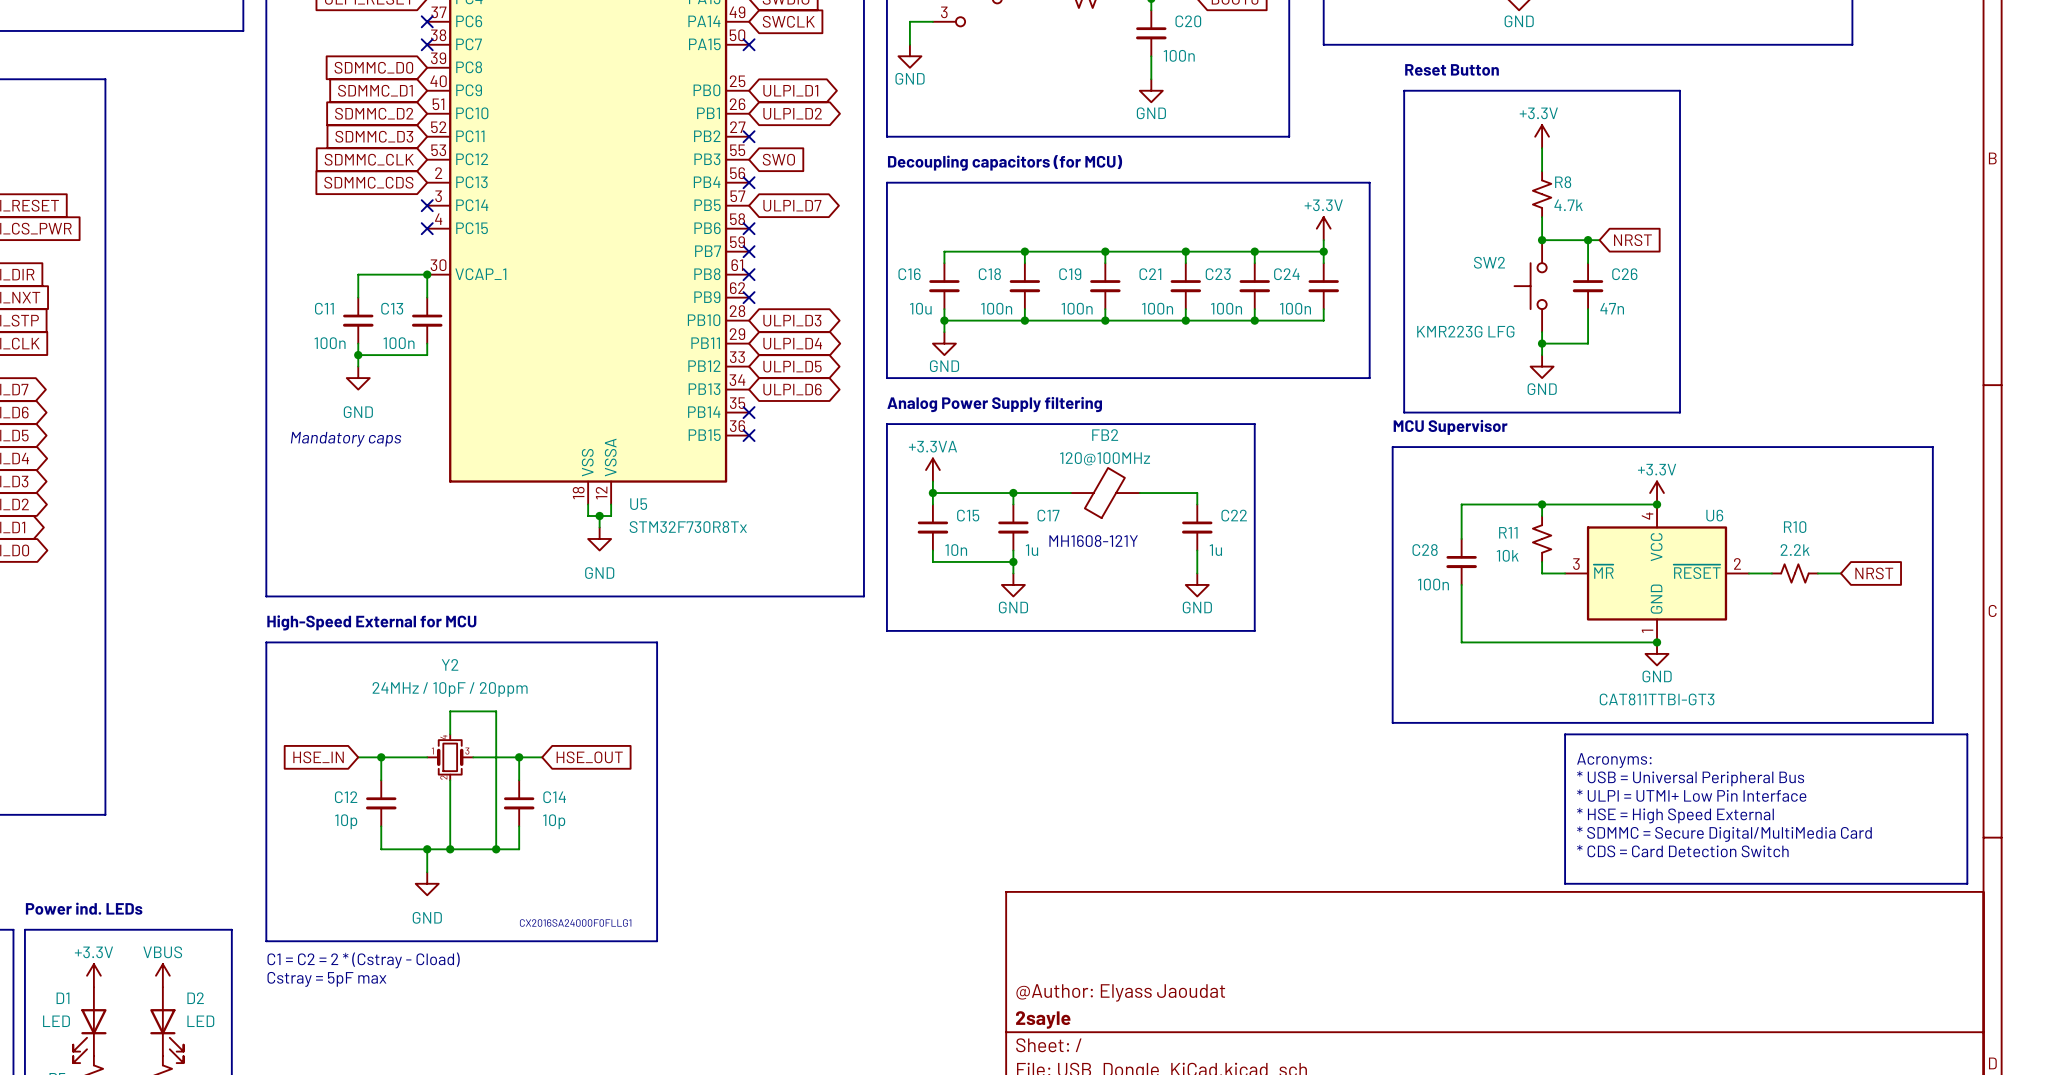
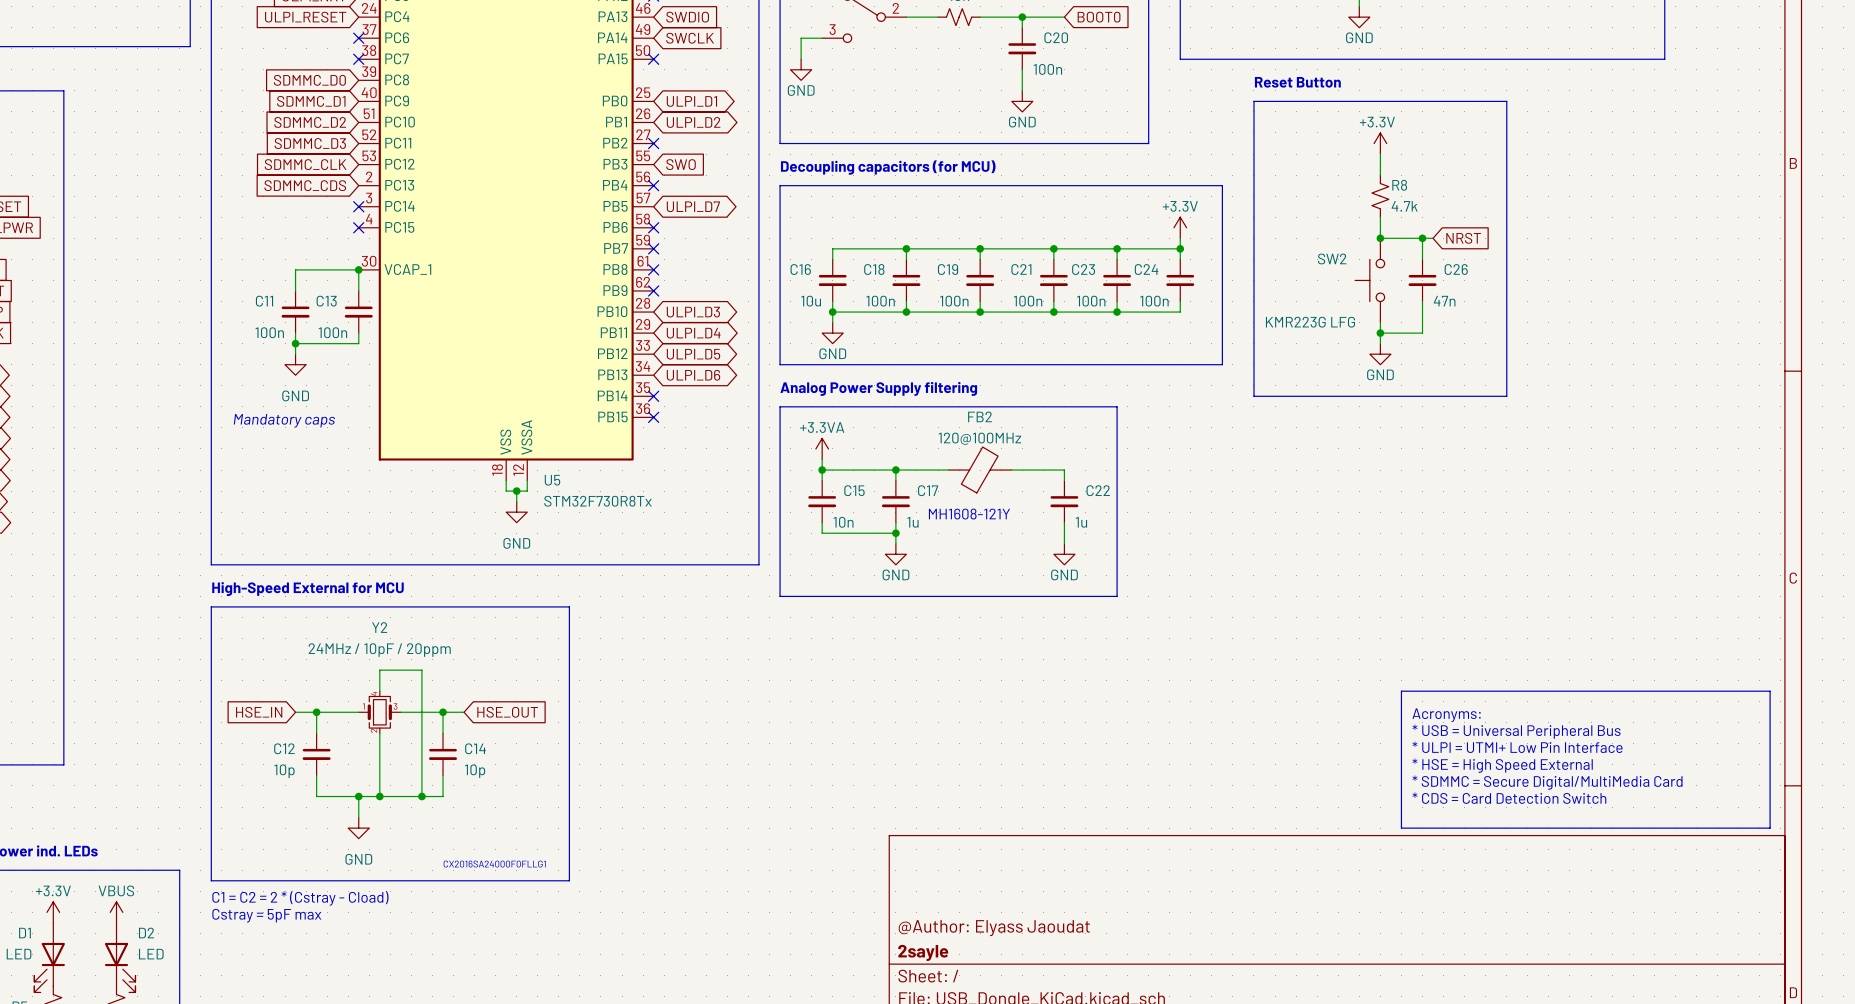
text: MCU Supervisor (1450, 427) -> none
line: (1392, 447) (1932, 447) (1932, 722) (1392, 722) (1392, 447) -> none
power symbol: +3.3V (1657, 493) -> none
wire: (1542, 504) (1542, 516) -> none
junction: (1542, 504) -> none
wire: (1657, 504) (1461, 504) (1461, 538) -> none
junction: (1657, 504) -> none
R11: 10k (1542, 538) -> none
C28: 100n (1461, 561) -> none
wire: (1542, 561) (1542, 573) (1565, 573) -> none
U6: CAT811TTBI-GT3 (1657, 573) -> none
wire: (1748, 573) (1771, 573) -> none
R10: 2.2k (1794, 573) -> none
wire: (1817, 573) (1840, 573) -> none
global label: NRST (1874, 573) -> none
wire: (1461, 584) (1461, 642) (1657, 642) -> none
junction: (1657, 642) -> none
power symbol: GND (1657, 653) -> none

